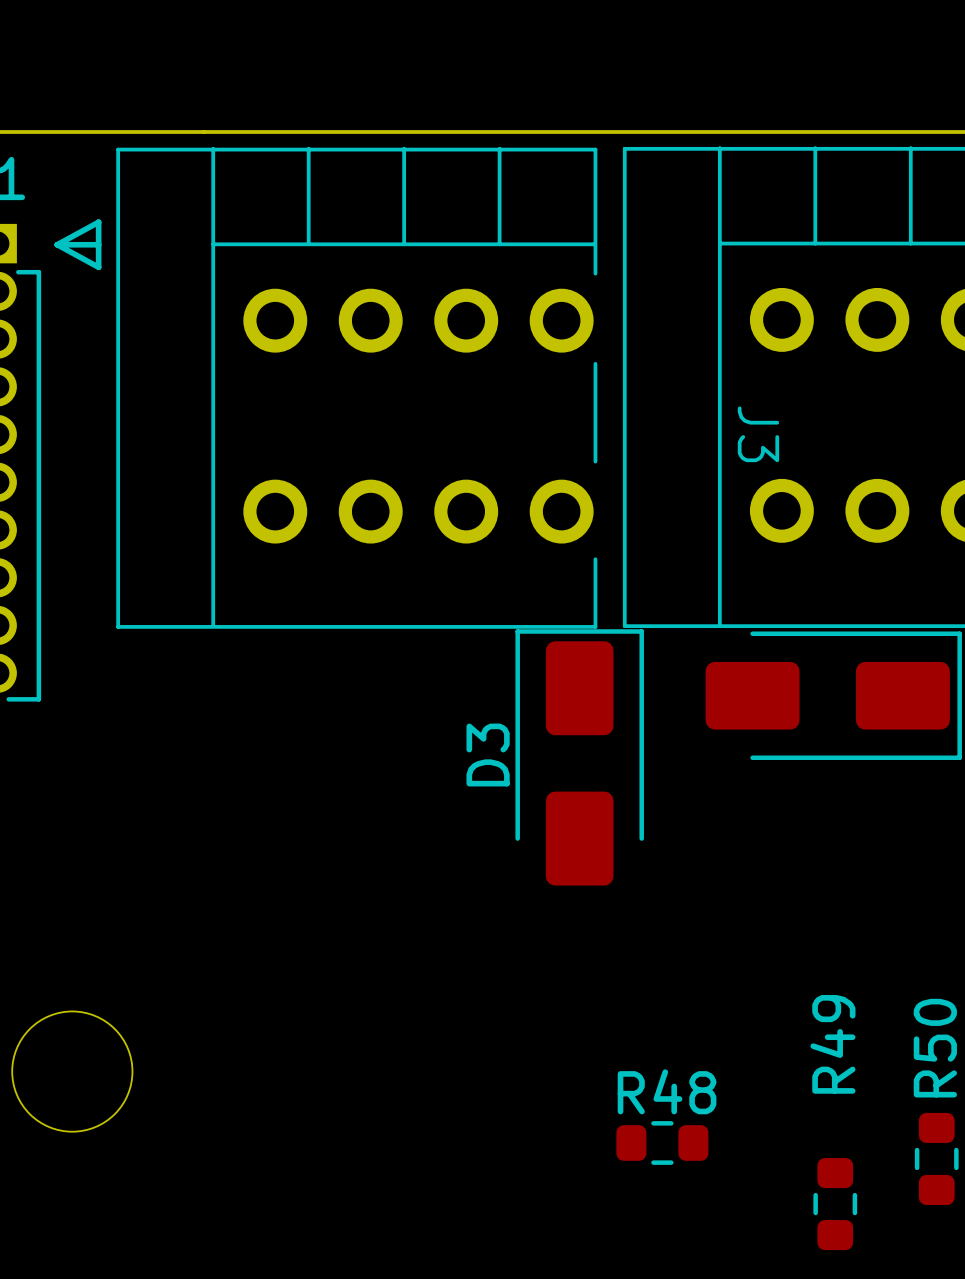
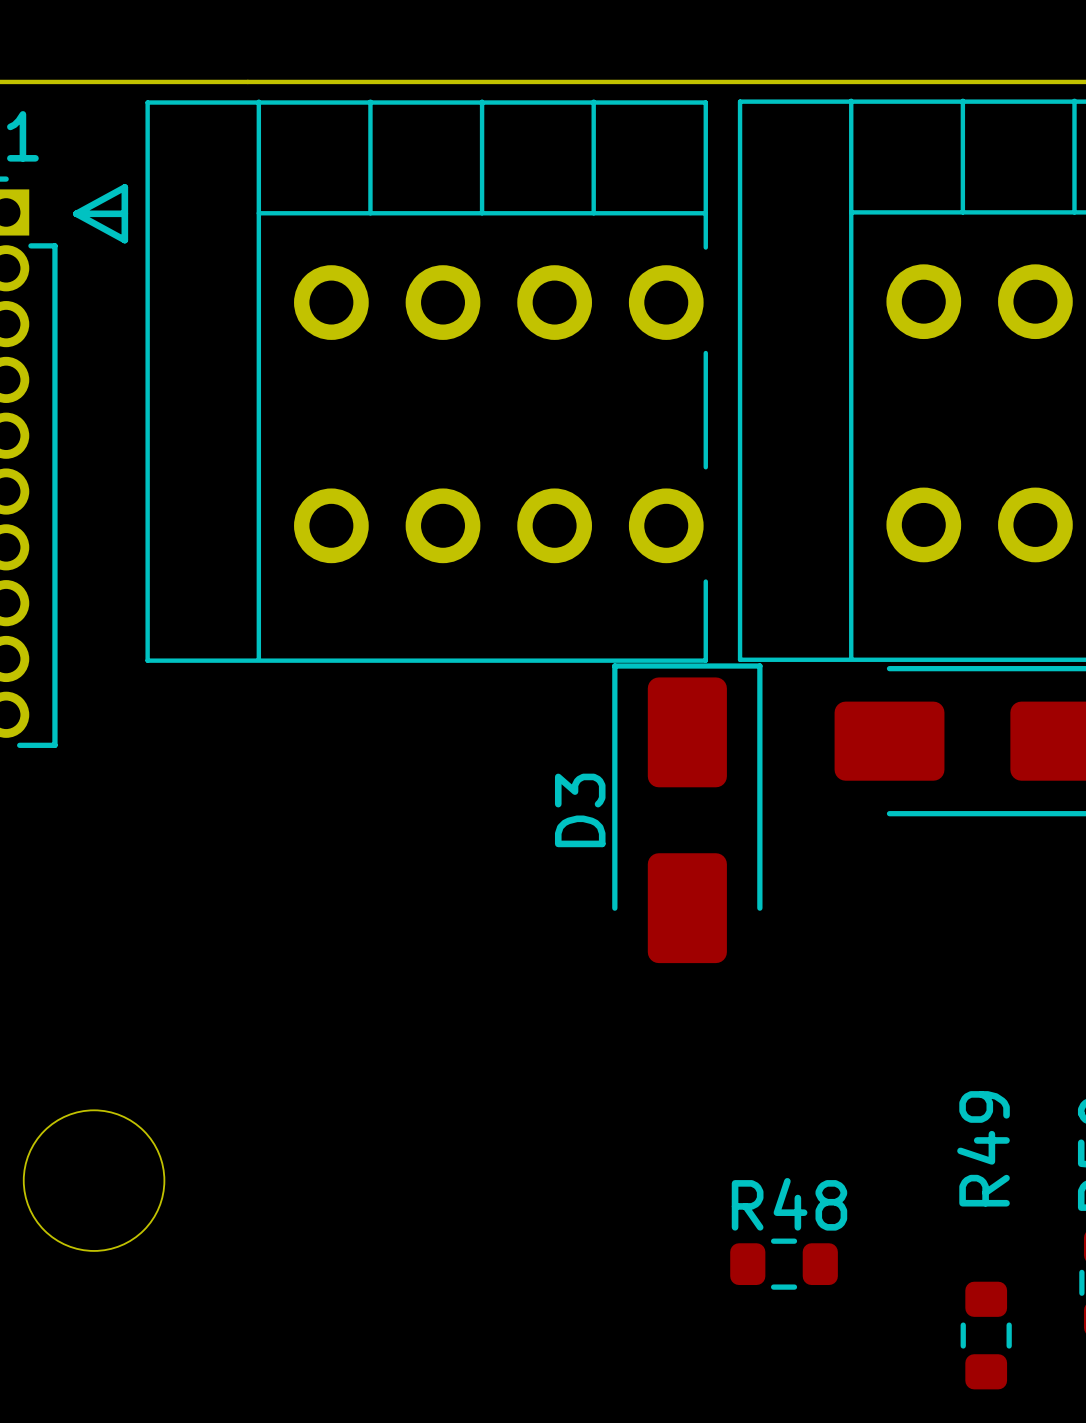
J3 name: J3 (758, 434) -> none

